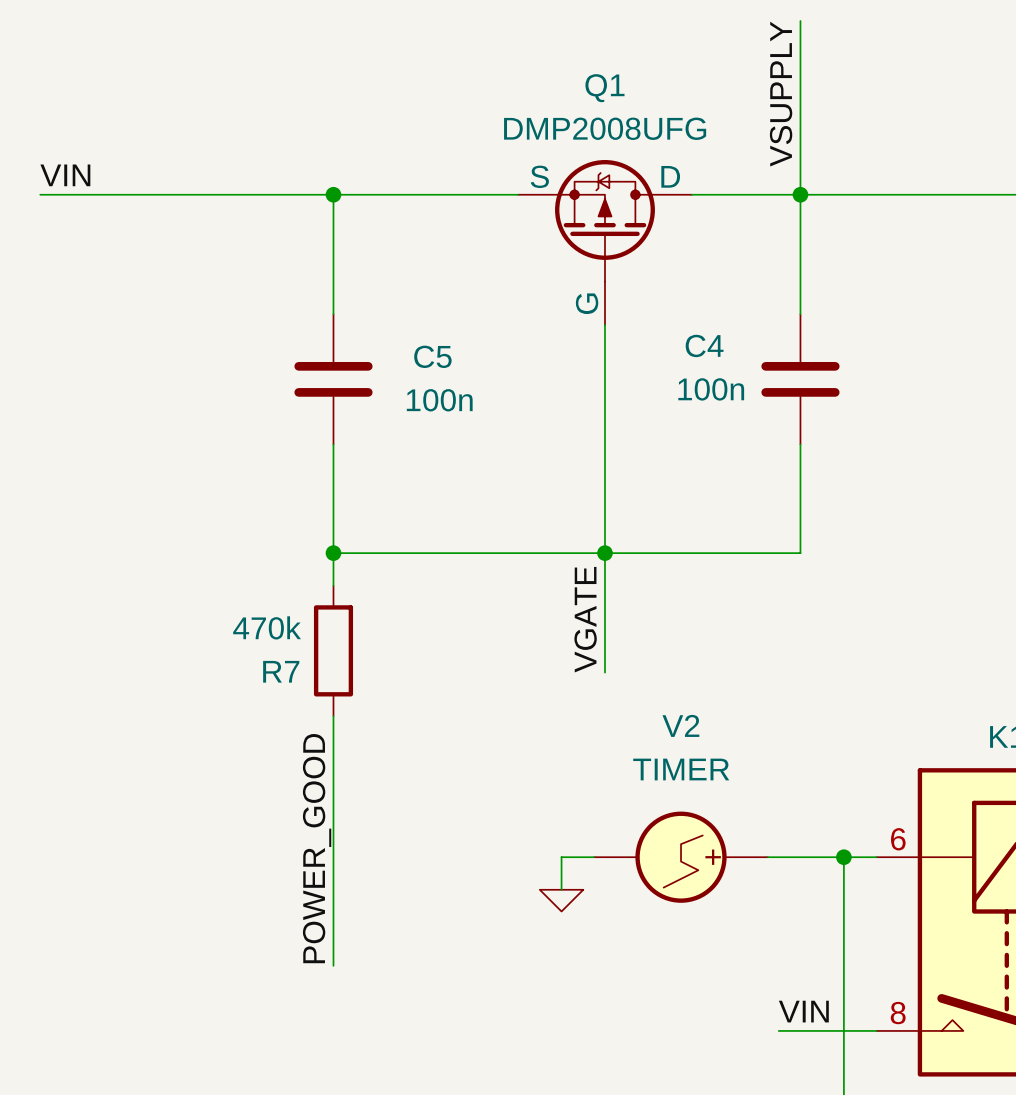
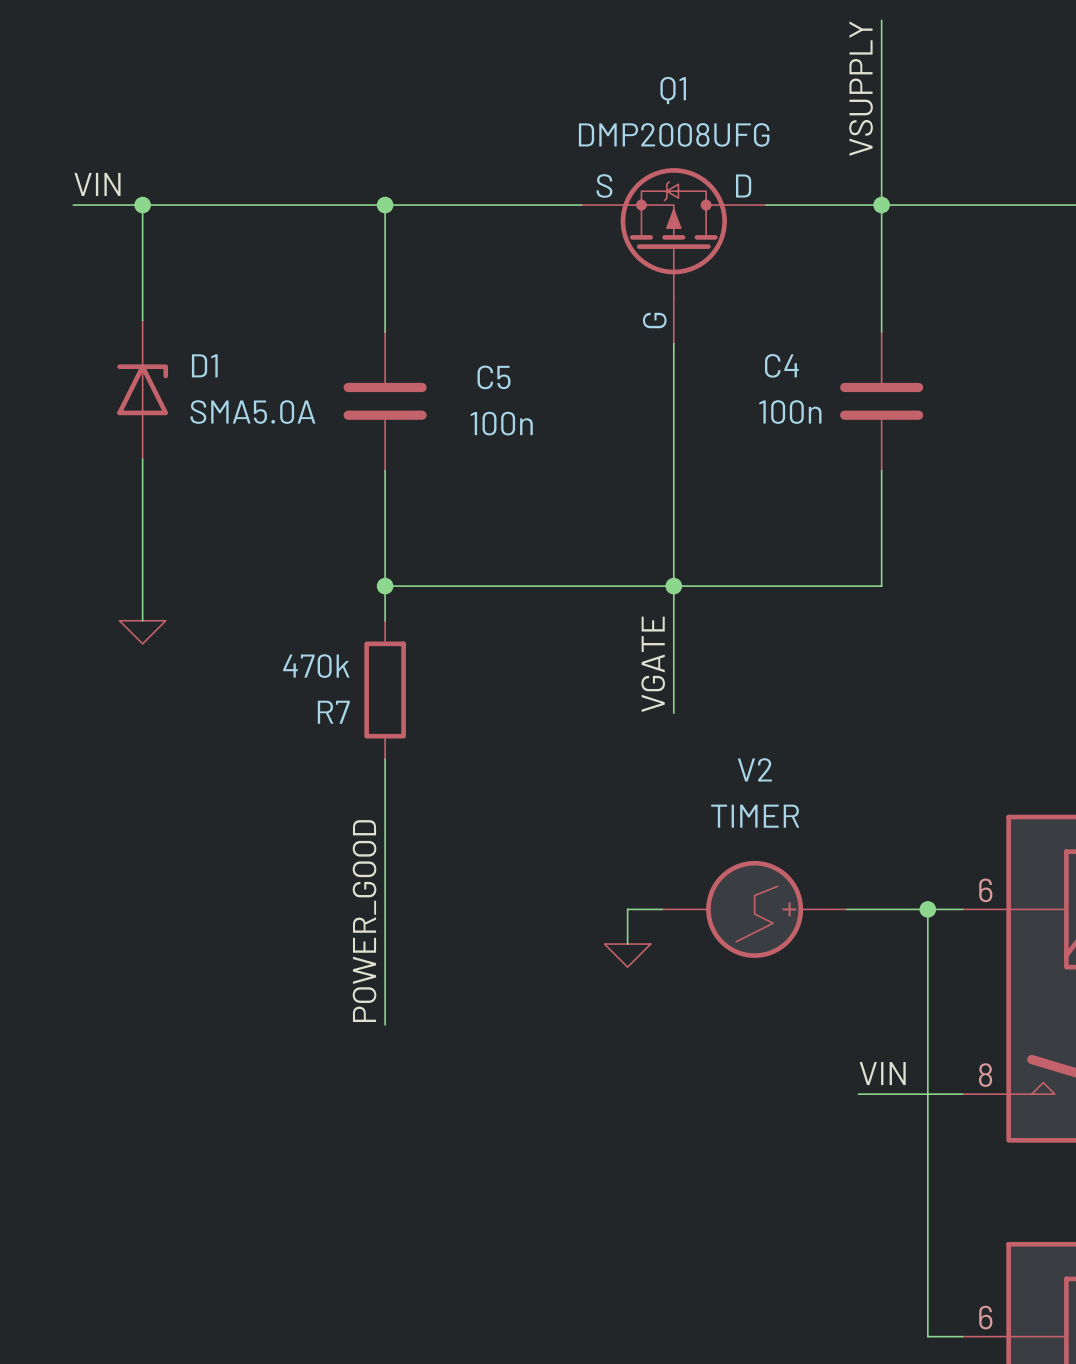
wire: none -> (142, 205) (142, 320)
junction: none -> (142, 205)
D1: none -> SMA5.0A (142, 389)
wire: none -> (142, 459) (142, 620)
power symbol: none -> (142, 632)

